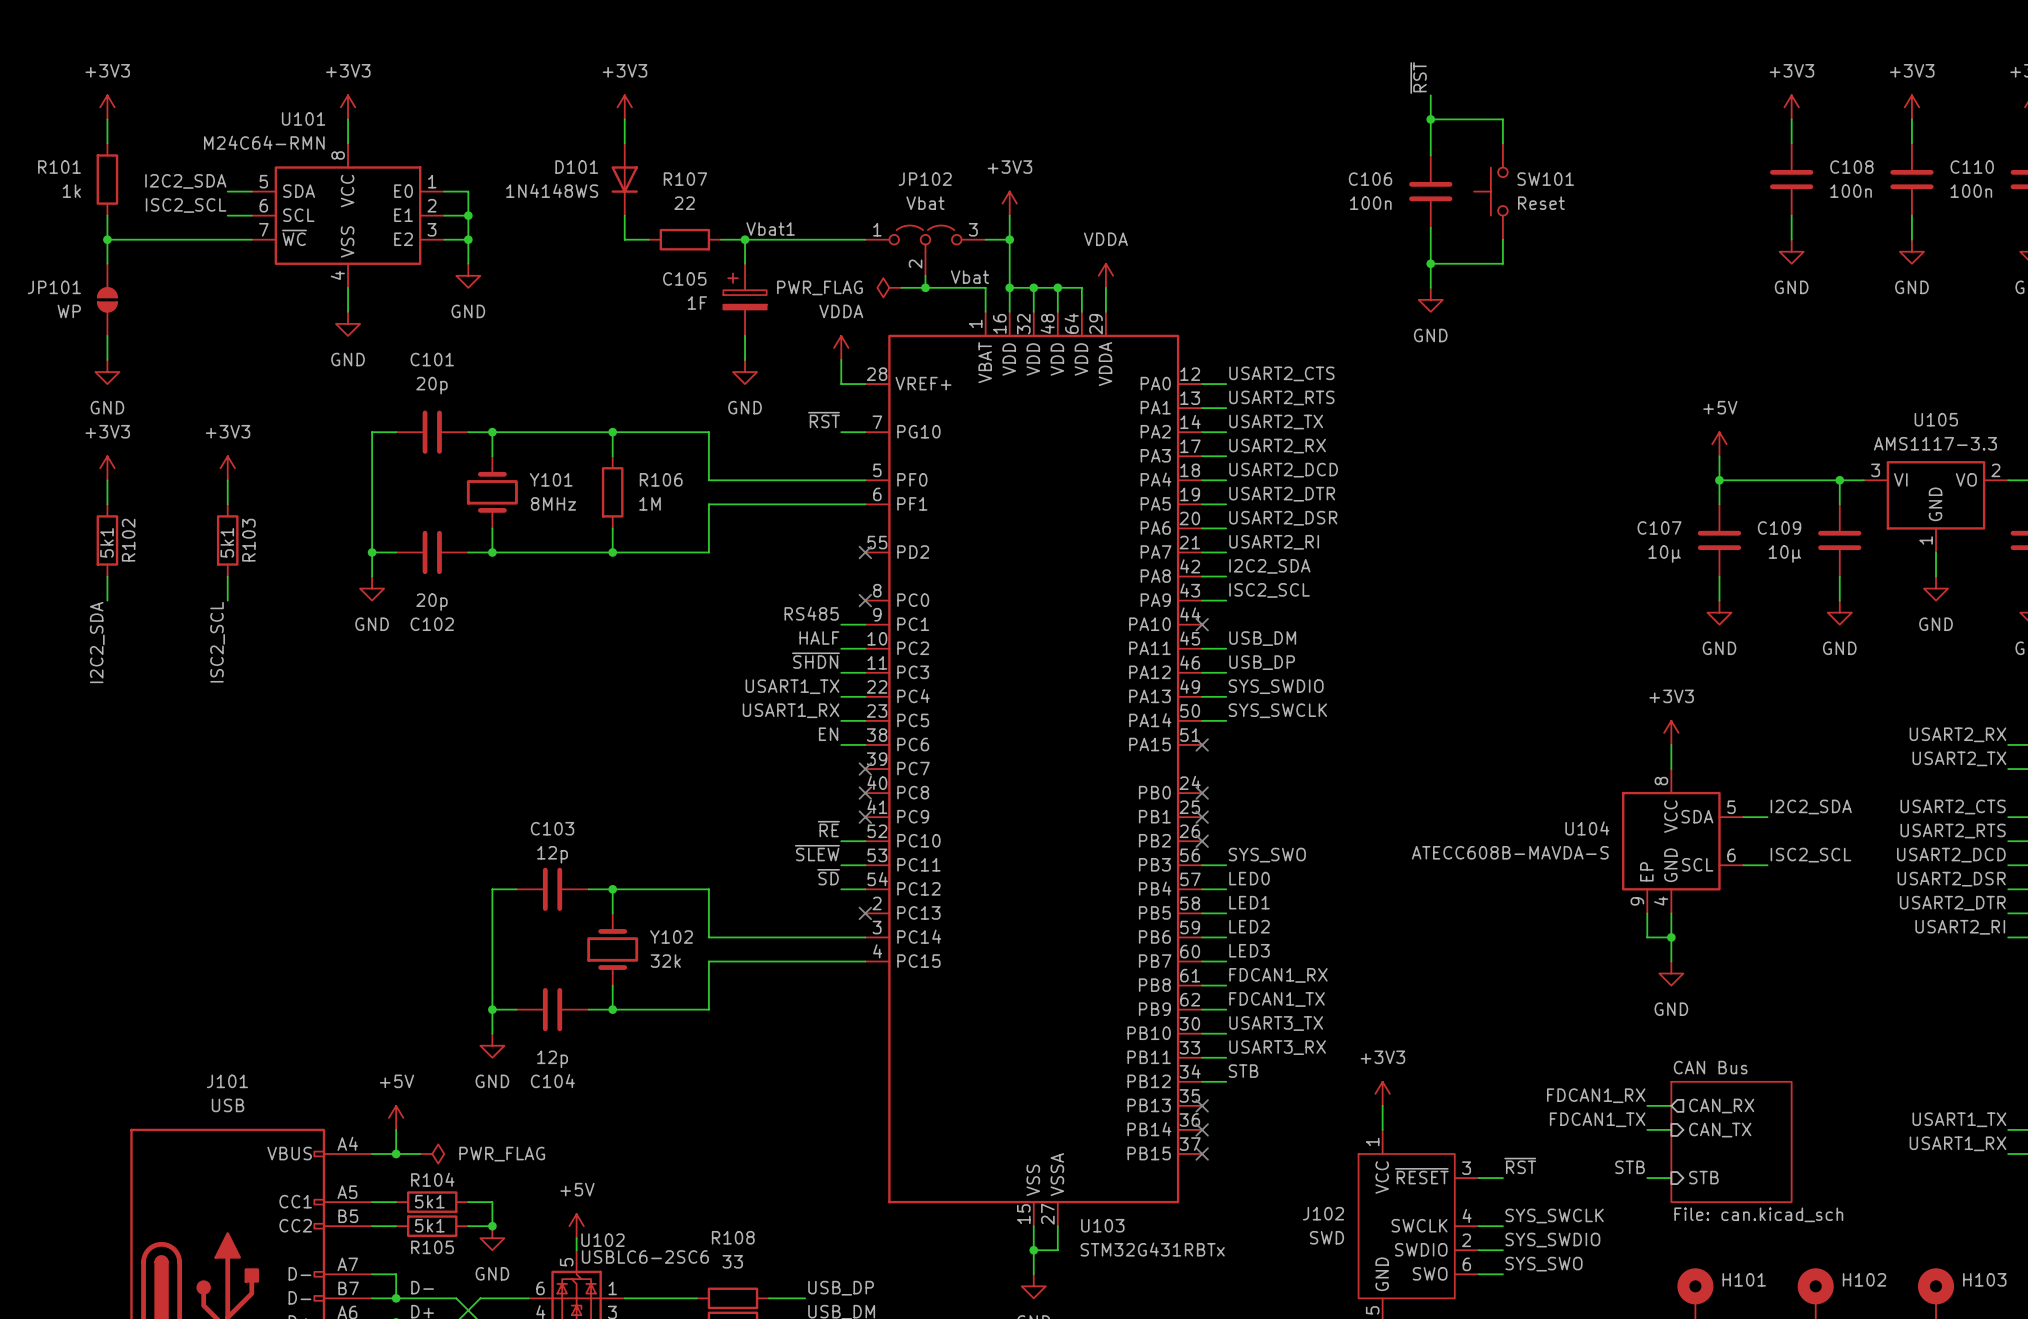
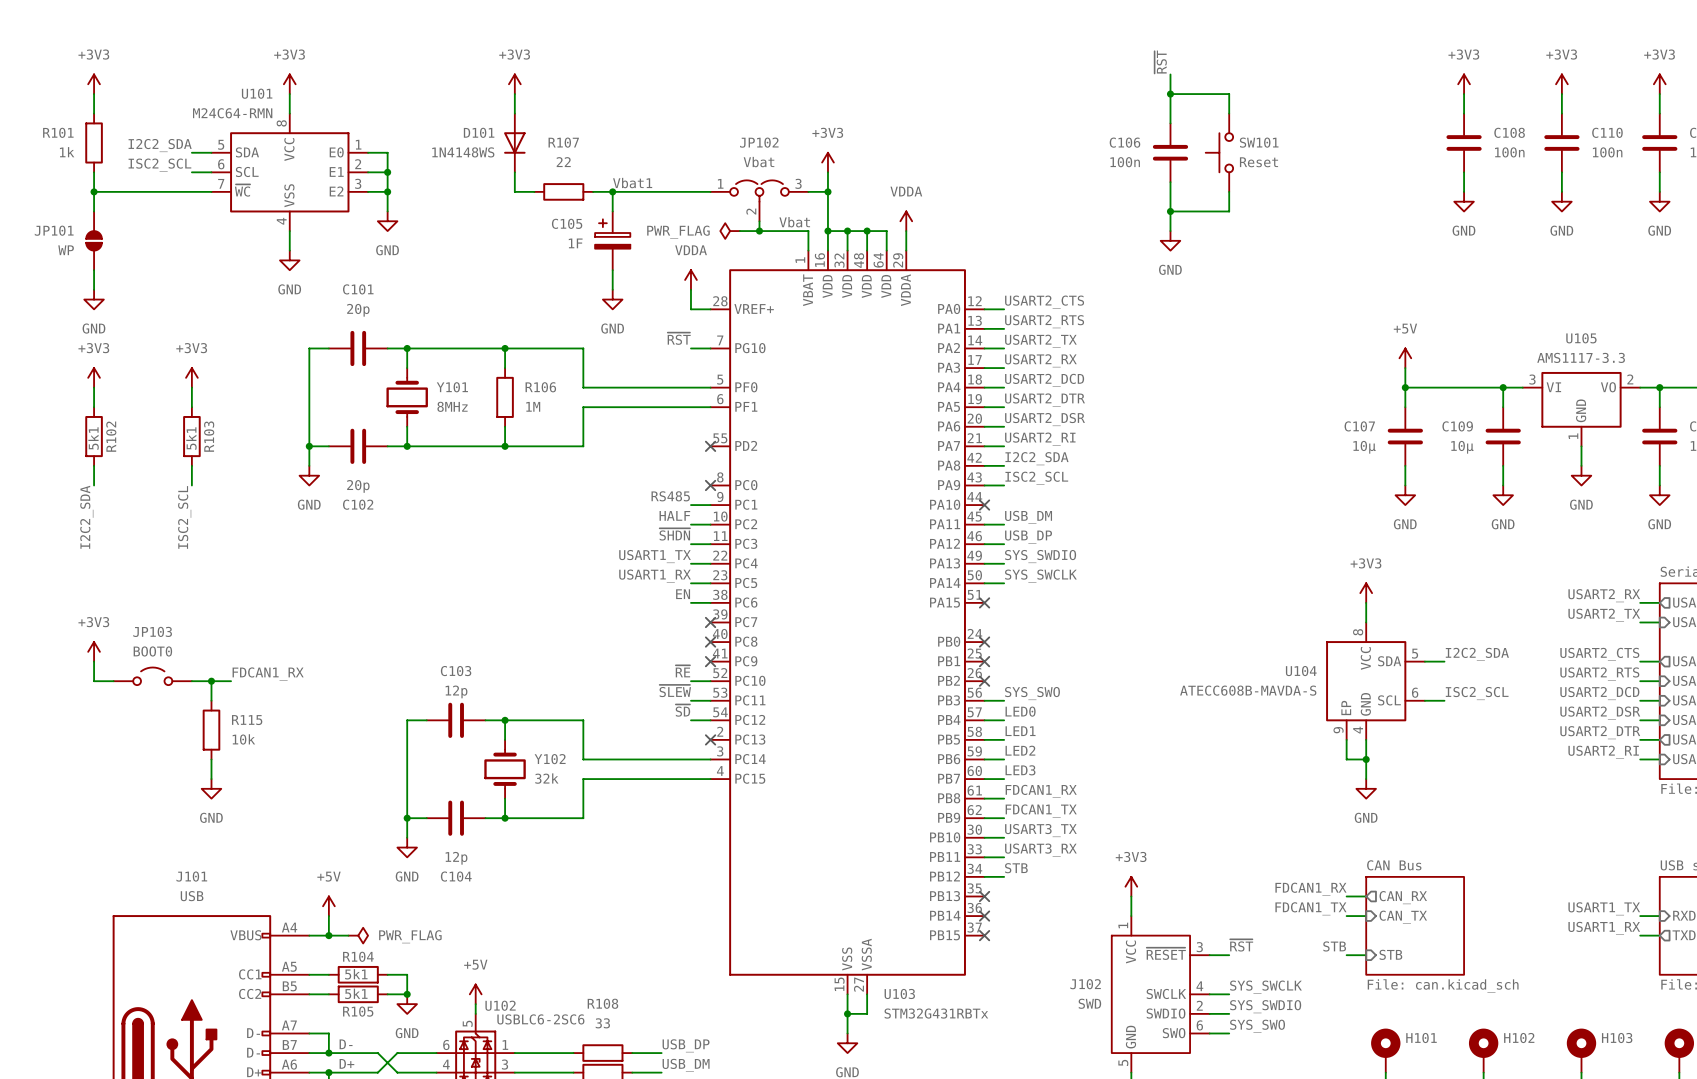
power symbol: none -> +3V3 (94, 651)
wire: none -> (94, 661) (94, 681) (113, 681)
label: none -> FDCAN1_RX (268, 673)
JP103: none -> BOOT0 (152, 676)
wire: none -> (191, 681) (231, 681)
wire: none -> (211, 681) (211, 700)
junction: none -> (211, 681)
R115: none -> 10k (211, 730)
wire: none -> (211, 759) (211, 779)
power symbol: none -> GND (211, 788)

